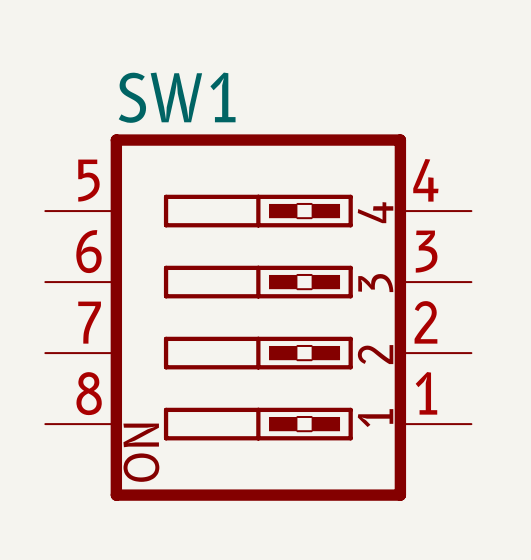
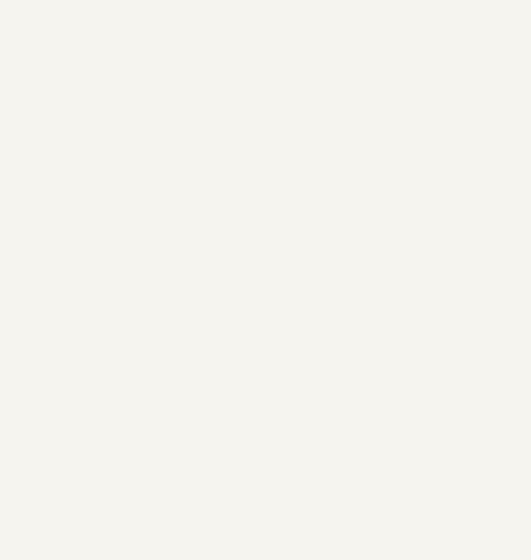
SW1: (258, 317) -> none

